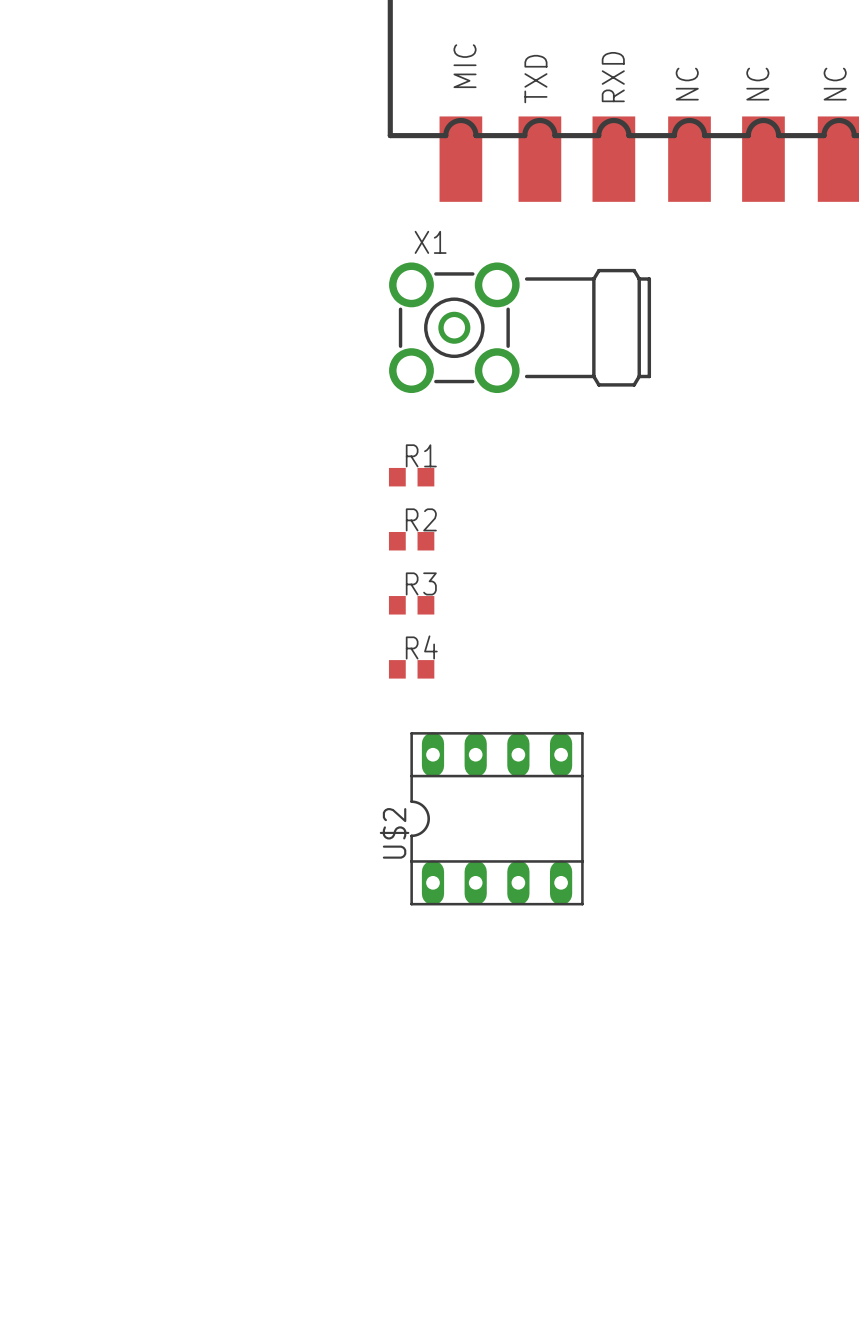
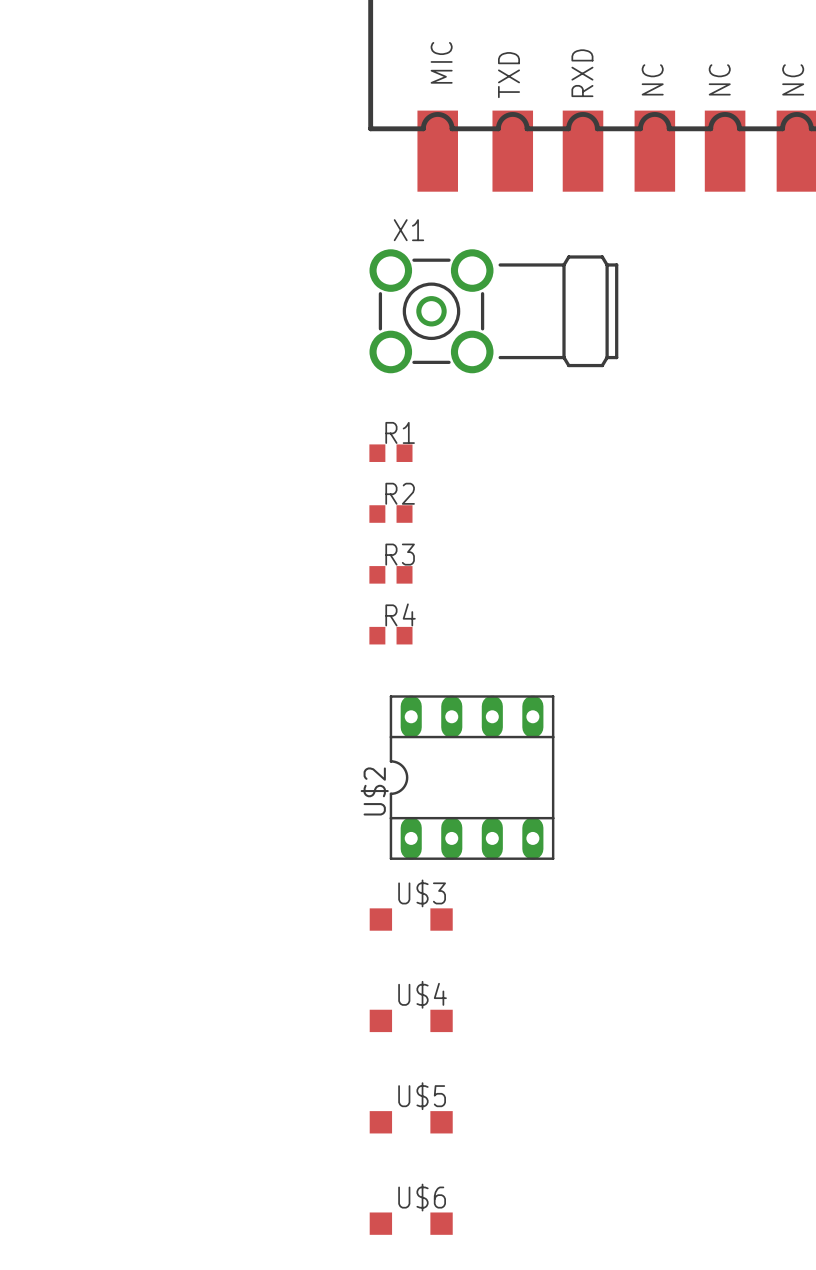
U$3: none -> (411, 919)
U$4: none -> (411, 1020)
U$5: none -> (411, 1122)
U$6: none -> (411, 1223)

